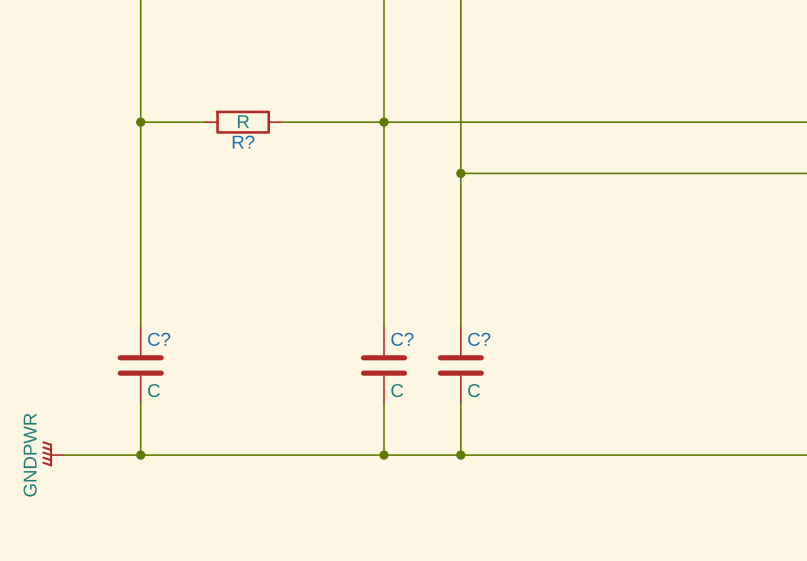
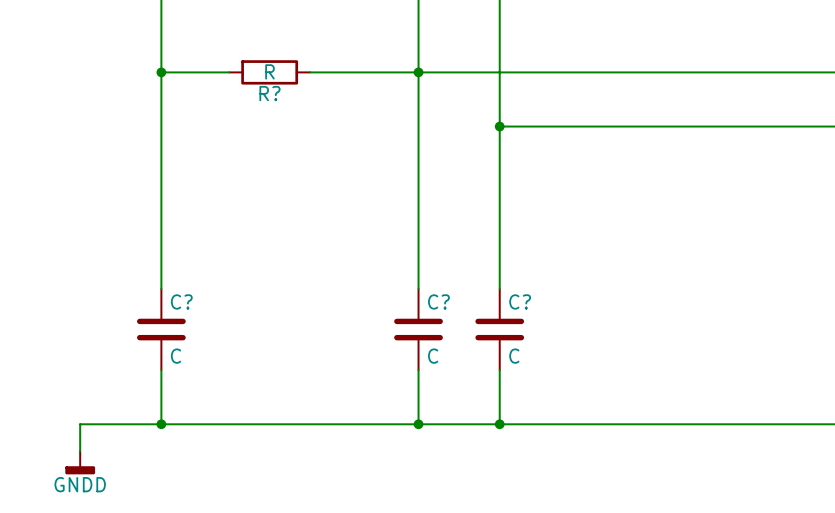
power symbol: GNDPWR (53, 453) -> none
wire: none -> (80, 424) (80, 451)
power symbol: none -> GNDD (80, 462)

